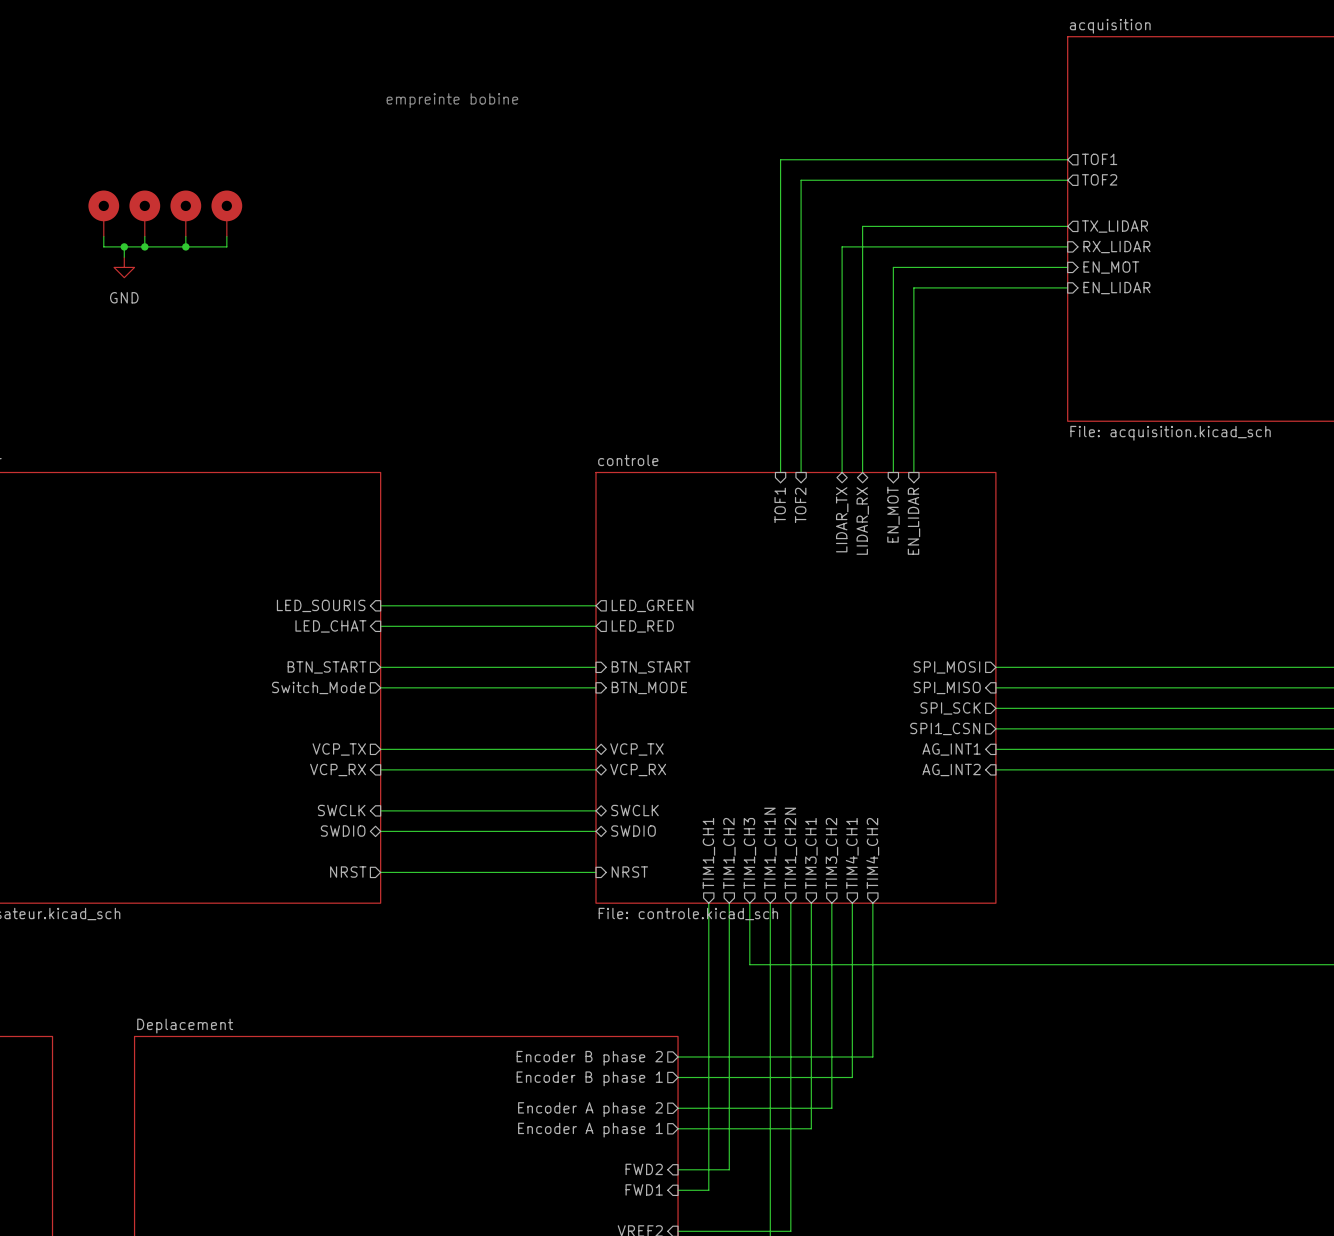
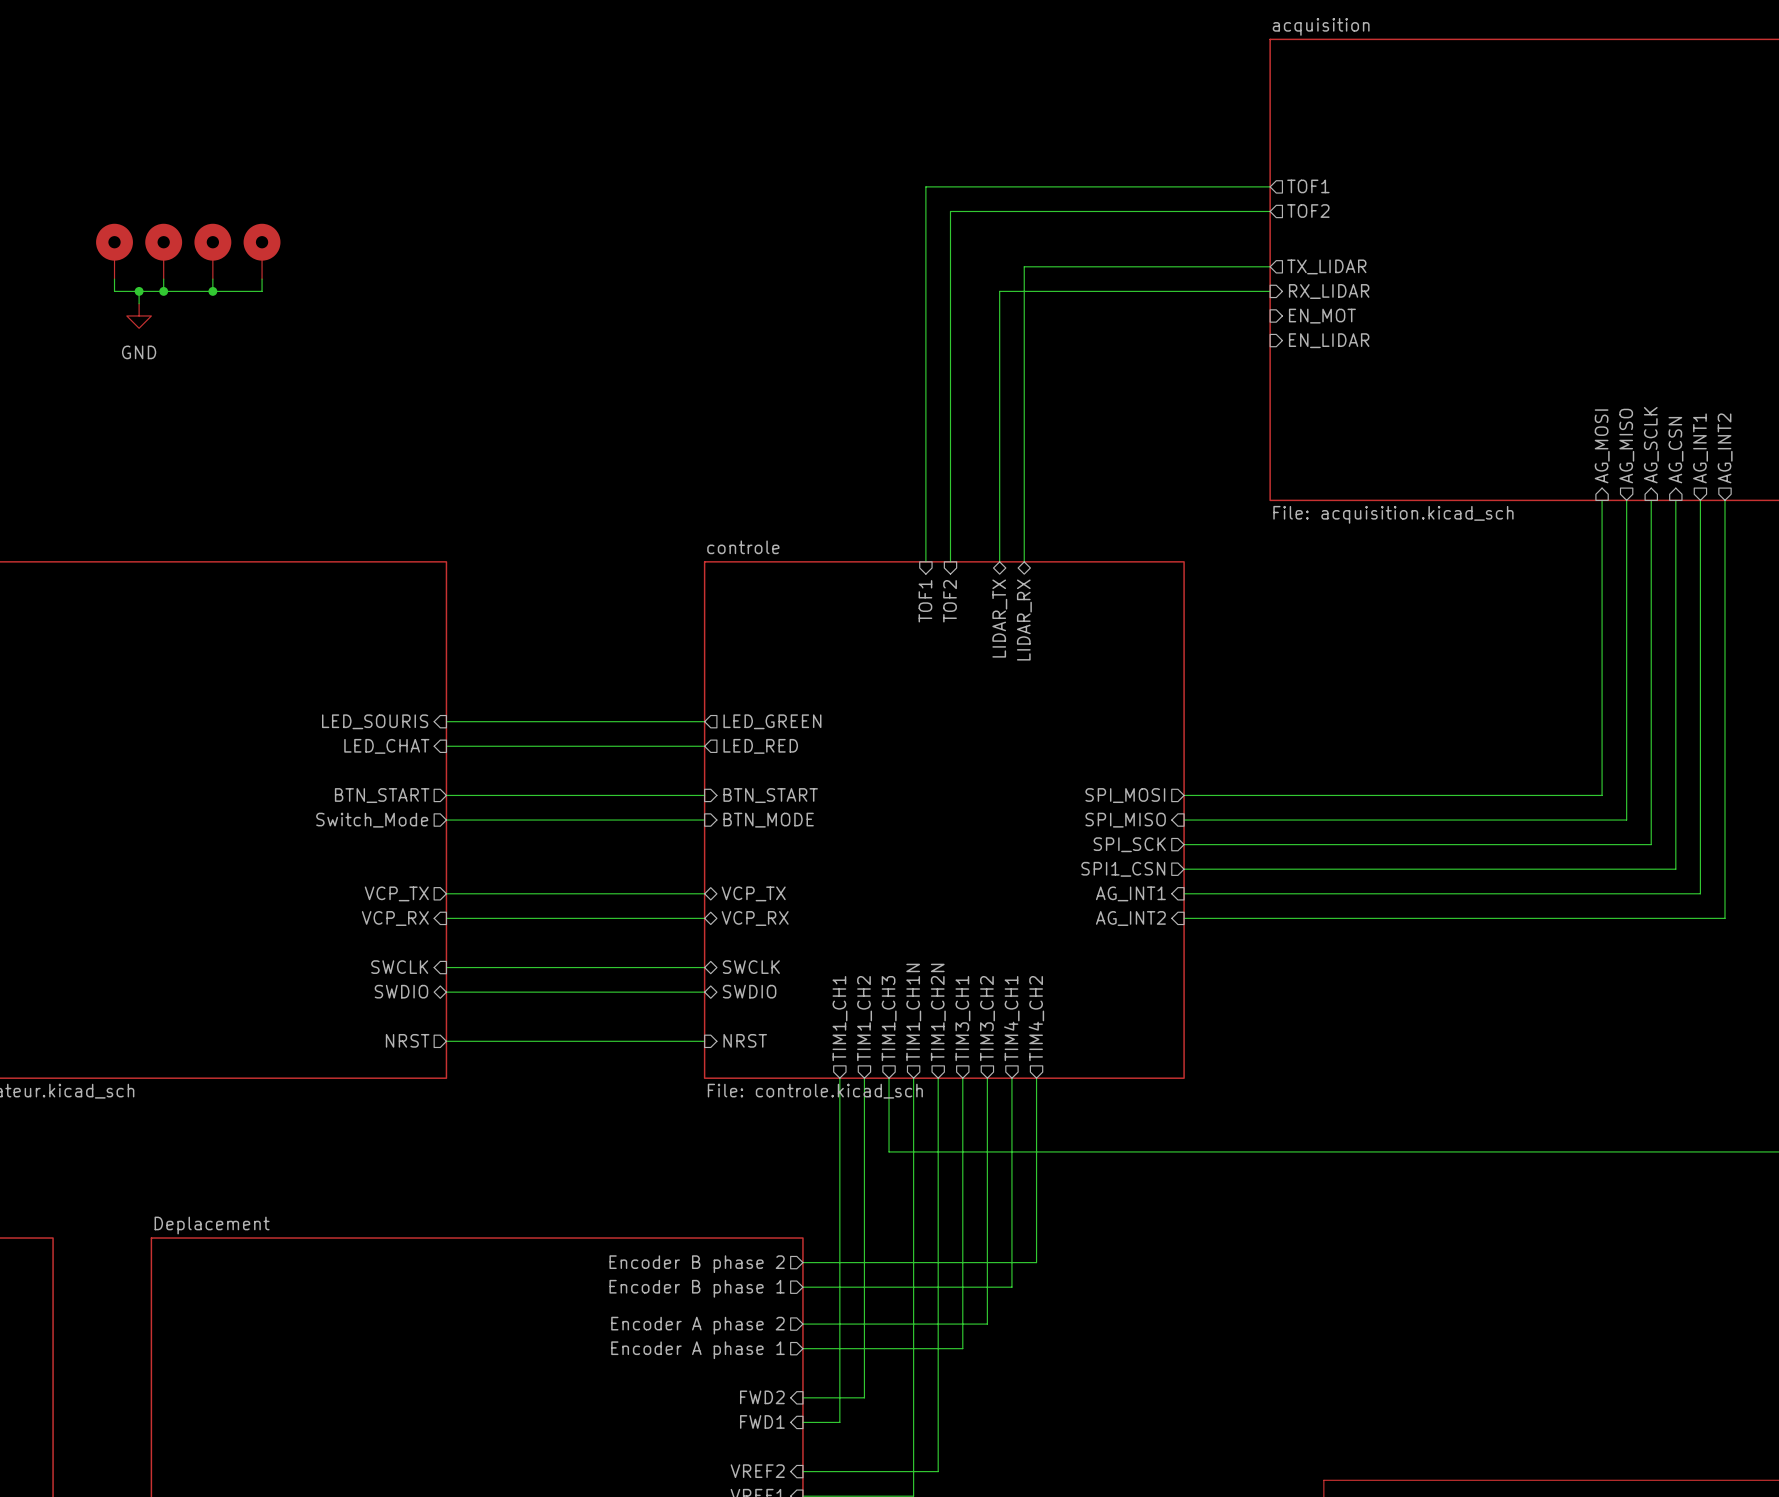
text: empreinte bobine (452, 100) -> none
wire: (1067, 267) (893, 267) (893, 472) -> none
wire: (1067, 287) (913, 287) (913, 472) -> none
sheet pin: EN_MOT (893, 514) -> none
sheet pin: EN_LIDAR (913, 521) -> none

